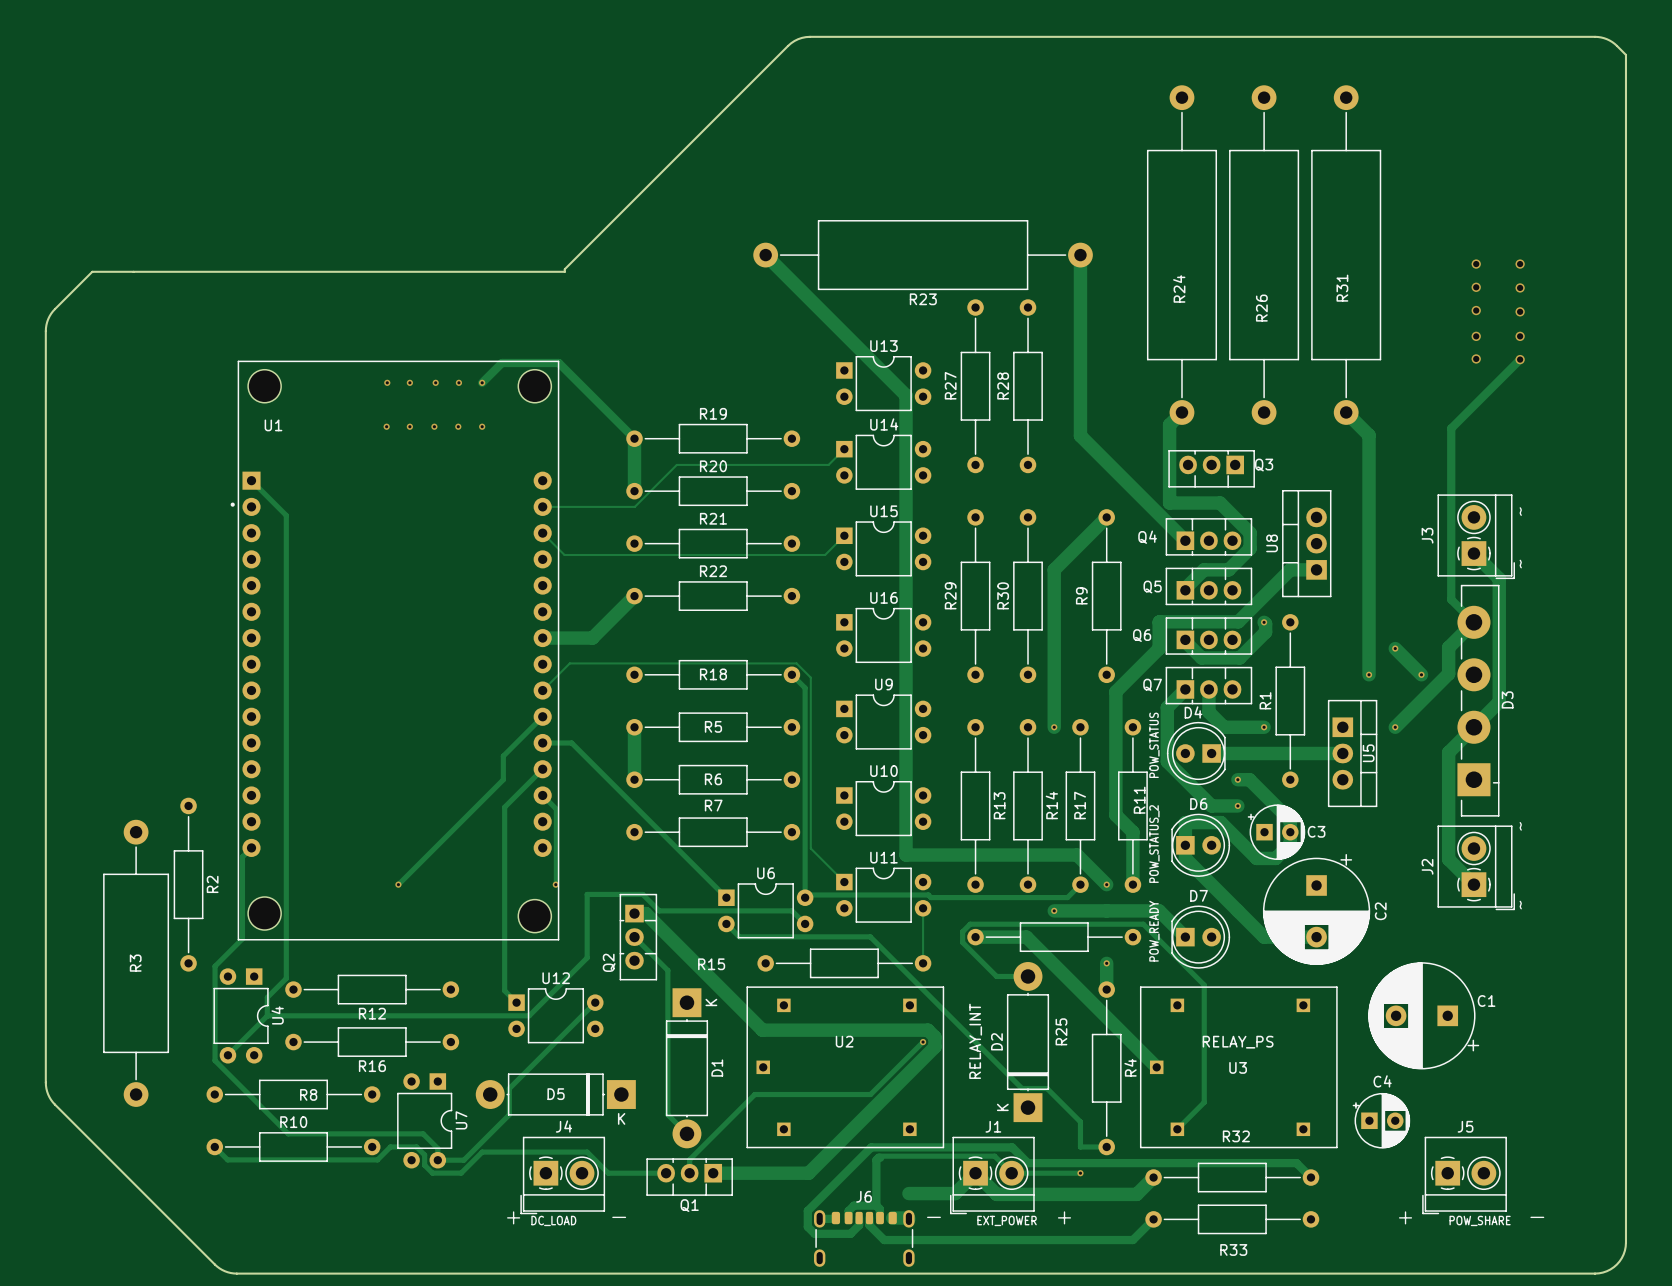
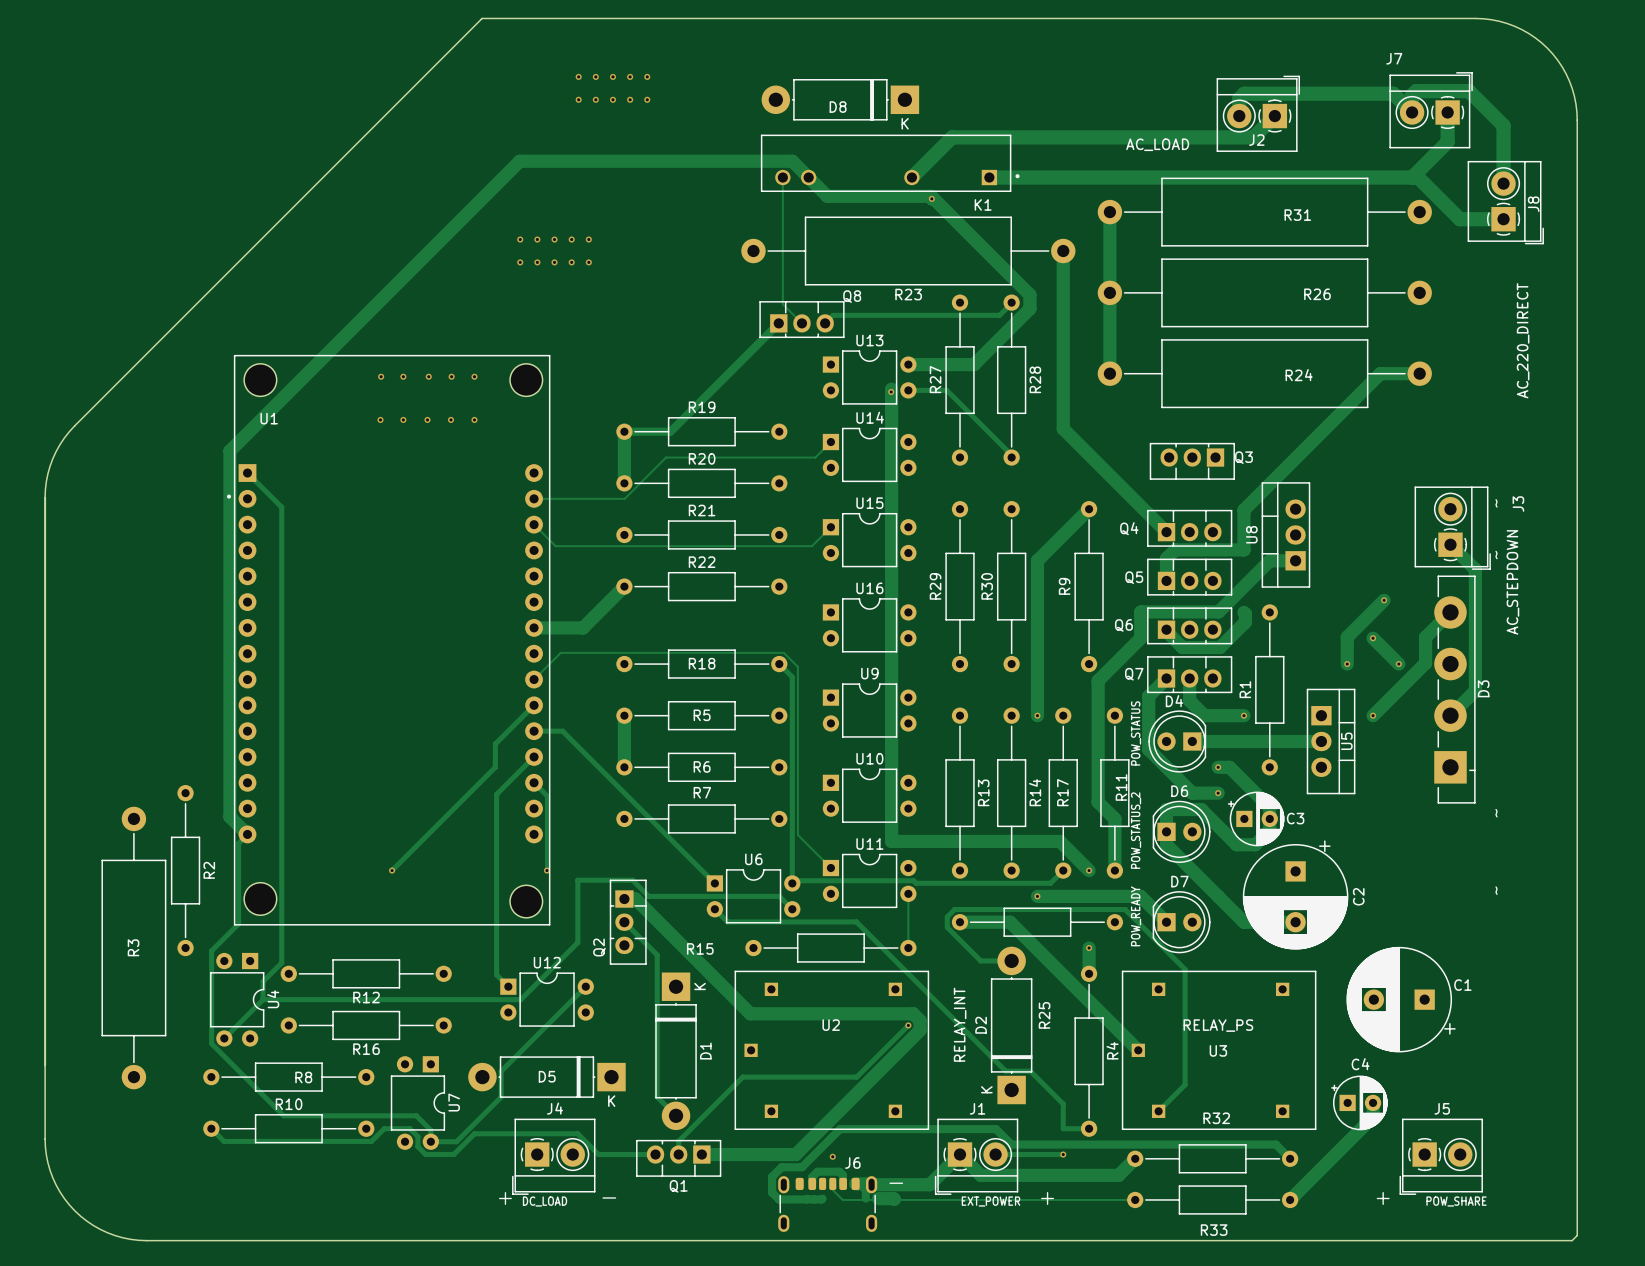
via: none -> (578, 76)
via: none -> (595, 76)
via: none -> (612, 76)
via: none -> (630, 76)
via: none -> (647, 76)
via: none -> (578, 99)
via: none -> (595, 99)
via: none -> (612, 99)
via: none -> (630, 99)
via: none -> (647, 99)
D8: none -> (840, 99)
J7: none -> (1431, 110)
track: none -> (1447, 112) (1447, 141) (1412, 177)
track: none -> (1239, 116) (1239, 98) (1244, 93) (1393, 93) (1412, 112) (1412, 95) (1416, 91) (1468, 91) (1503, 125) (1503, 183)
track: none -> (1274, 116) (1253, 137) (952, 137) (911, 177)
text: none -> AC_LOAD (1157, 144)
K1: none -> (890, 163)
track: none -> (782, 177) (782, 304) (801, 323)
track: none -> (989, 177) (1418, 177) (1459, 219) (1503, 219)
via: none -> (931, 198)
J8: none -> (1505, 202)
track: none -> (1109, 212) (1109, 373)
via: none -> (520, 239)
via: none -> (537, 239)
via: none -> (554, 239)
via: none -> (571, 239)
via: none -> (588, 239)
track: (765, 255) (906, 395) -> none
R24 rotation: 0° (1181, 255) -> 90° clockwise (1264, 373)
R26 rotation: 0° (1264, 255) -> 90° clockwise (1264, 292)
R31 rotation: 0° (1346, 255) -> 90° clockwise (1264, 212)
via: (1476, 264) -> none
via: (1520, 264) -> none
via: none -> (520, 262)
via: none -> (537, 262)
via: none -> (554, 262)
via: none -> (571, 262)
via: none -> (588, 262)
via: (1476, 287) -> none
via: (1520, 287) -> none
R24 name position: R24 (1179, 288) -> R24 (1299, 375)
R31 name position: R31 (1342, 288) -> R31 (1297, 215)
track: none -> (1013, 301) (999, 315) (833, 315) (825, 323)
R26 name position: R26 (1261, 308) -> R26 (1317, 294)
via: (1476, 310) -> none
via: (1520, 311) -> none
Q8: none -> (801, 319)
via: (1476, 336) -> none
via: (1520, 336) -> none
text: none -> AC_220_DIRECT (1523, 340)
via: (1476, 358) -> none
track: (1520, 359) (1451, 428) (1451, 599) (1473, 622) -> none
via: (1520, 359) -> none
track: none -> (908, 364) (974, 364) (1029, 308) (1029, 294) (931, 196) (827, 196) (792, 161) (519, 161) (229, 451) (229, 816) (247, 834)
track: (482, 382) (502, 363) (558, 363) (634, 438) -> (778, 323) (670, 431) (624, 431)
R28 name position: R28 (1003, 385) -> R28 (1035, 379)
track: none -> (908, 390) (946, 390) (1013, 456)
via: none -> (891, 391)
track: (1181, 412) (1169, 424) (1169, 503) (1220, 503) (1250, 532) (1250, 548) (1228, 569) (1204, 569) (1185, 588) -> (1419, 373) (1380, 373) (1243, 510) (1243, 549) (1175, 549) (1166, 558) (1166, 579)
track: (1346, 412) (1369, 435) (1369, 647) -> (1384, 600) (1347, 637)
board edge: (45, 505) (46, 325) (52, 311) (92, 271) (564, 271) (564, 269) (788, 45) (801, 37) (1595, 36) (1609, 40) (1625, 54) (1625, 1242) (1621, 1258) (1610, 1269) (1595, 1273) (233, 1273) (224, 1271) (214, 1264) (54, 1104) (48, 1094) (45, 1082) -> (45, 497) (46, 481) (52, 458) (69, 431) (482, 18) (1483, 18) (1514, 26) (1541, 42) (1562, 67) (1574, 96) (1577, 120) (1577, 1235) (1572, 1240) (138, 1240) (115, 1235) (86, 1221) (69, 1205) (56, 1185) (50, 1170) (45, 1146) (45, 1065)
J3 name position: J3 (1427, 535) -> J3 (1518, 504)
text: none -> AC_STEPDOWN (1512, 582)
via: none -> (1384, 600)
via: (1264, 622) -> none
track: (1473, 727) (1448, 752) (1448, 859) (1473, 884) -> none
J2 name position: J2 (1427, 866) -> J2 (1256, 140)
J2 rotation: 0° (1476, 867) -> 90° counterclockwise (1258, 113)
J2 position: (1476, 867) -> (1258, 113)
track: none -> (1373, 1102) (1373, 1117) (1290, 1199)
track: (871, 1147) (807, 1210) (807, 1226) (814, 1233) (850, 1233) (859, 1225) (859, 1218) -> (857, 1129) (840, 1129) (801, 1167) (781, 1167) (772, 1176) (772, 1192) (778, 1199) (806, 1199)
track: (880, 1156) (994, 1156) (1011, 1173) -> none
track: (880, 1157) (876, 1160) (876, 1205) (853, 1205) (848, 1211) (848, 1218) -> none
via: none -> (832, 1156)
track: (908, 1193) (955, 1193) -> (855, 1183) (929, 1184) (939, 1174)
J6 name position: J6 (864, 1196) -> J6 (852, 1163)
track: none -> (812, 1183) (812, 1176) (817, 1171) (839, 1171) (842, 1175) (842, 1183)
text position: - (933, 1217) -> - (896, 1183)
text: - (1537, 1217) -> none
track: (869, 1218) (869, 1225) (884, 1240) (1132, 1240) (1153, 1219) -> (832, 1183) (832, 1190) (842, 1199) (1135, 1199)
J6 position: (864, 1238) -> (827, 1204)

